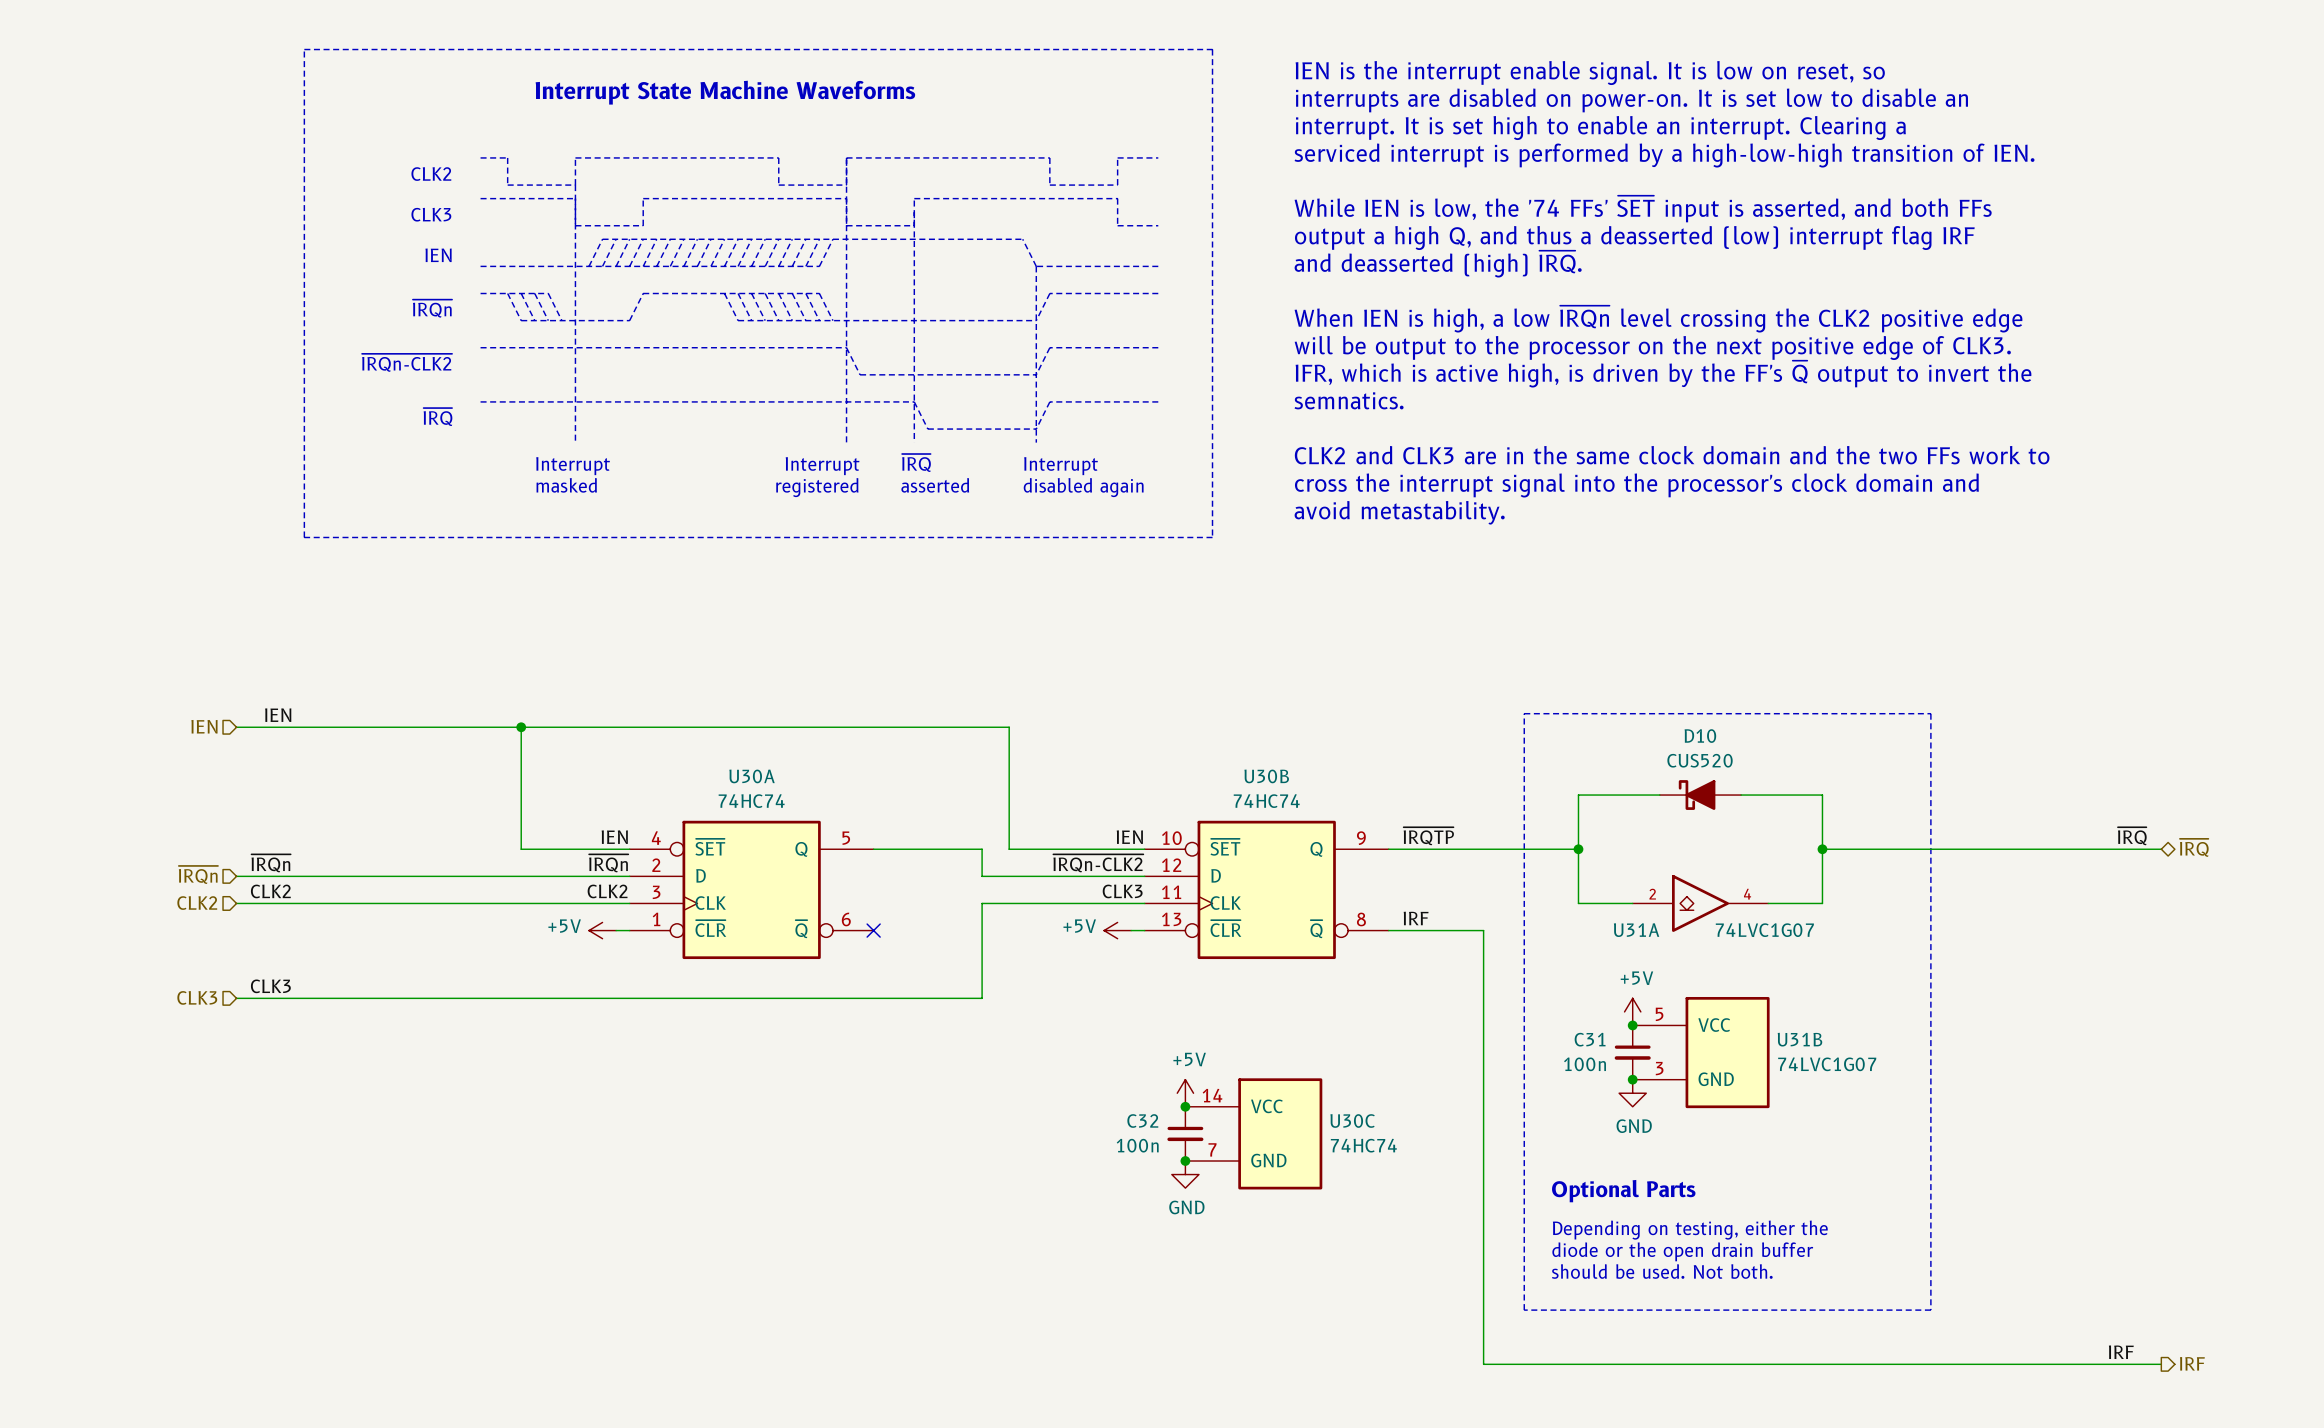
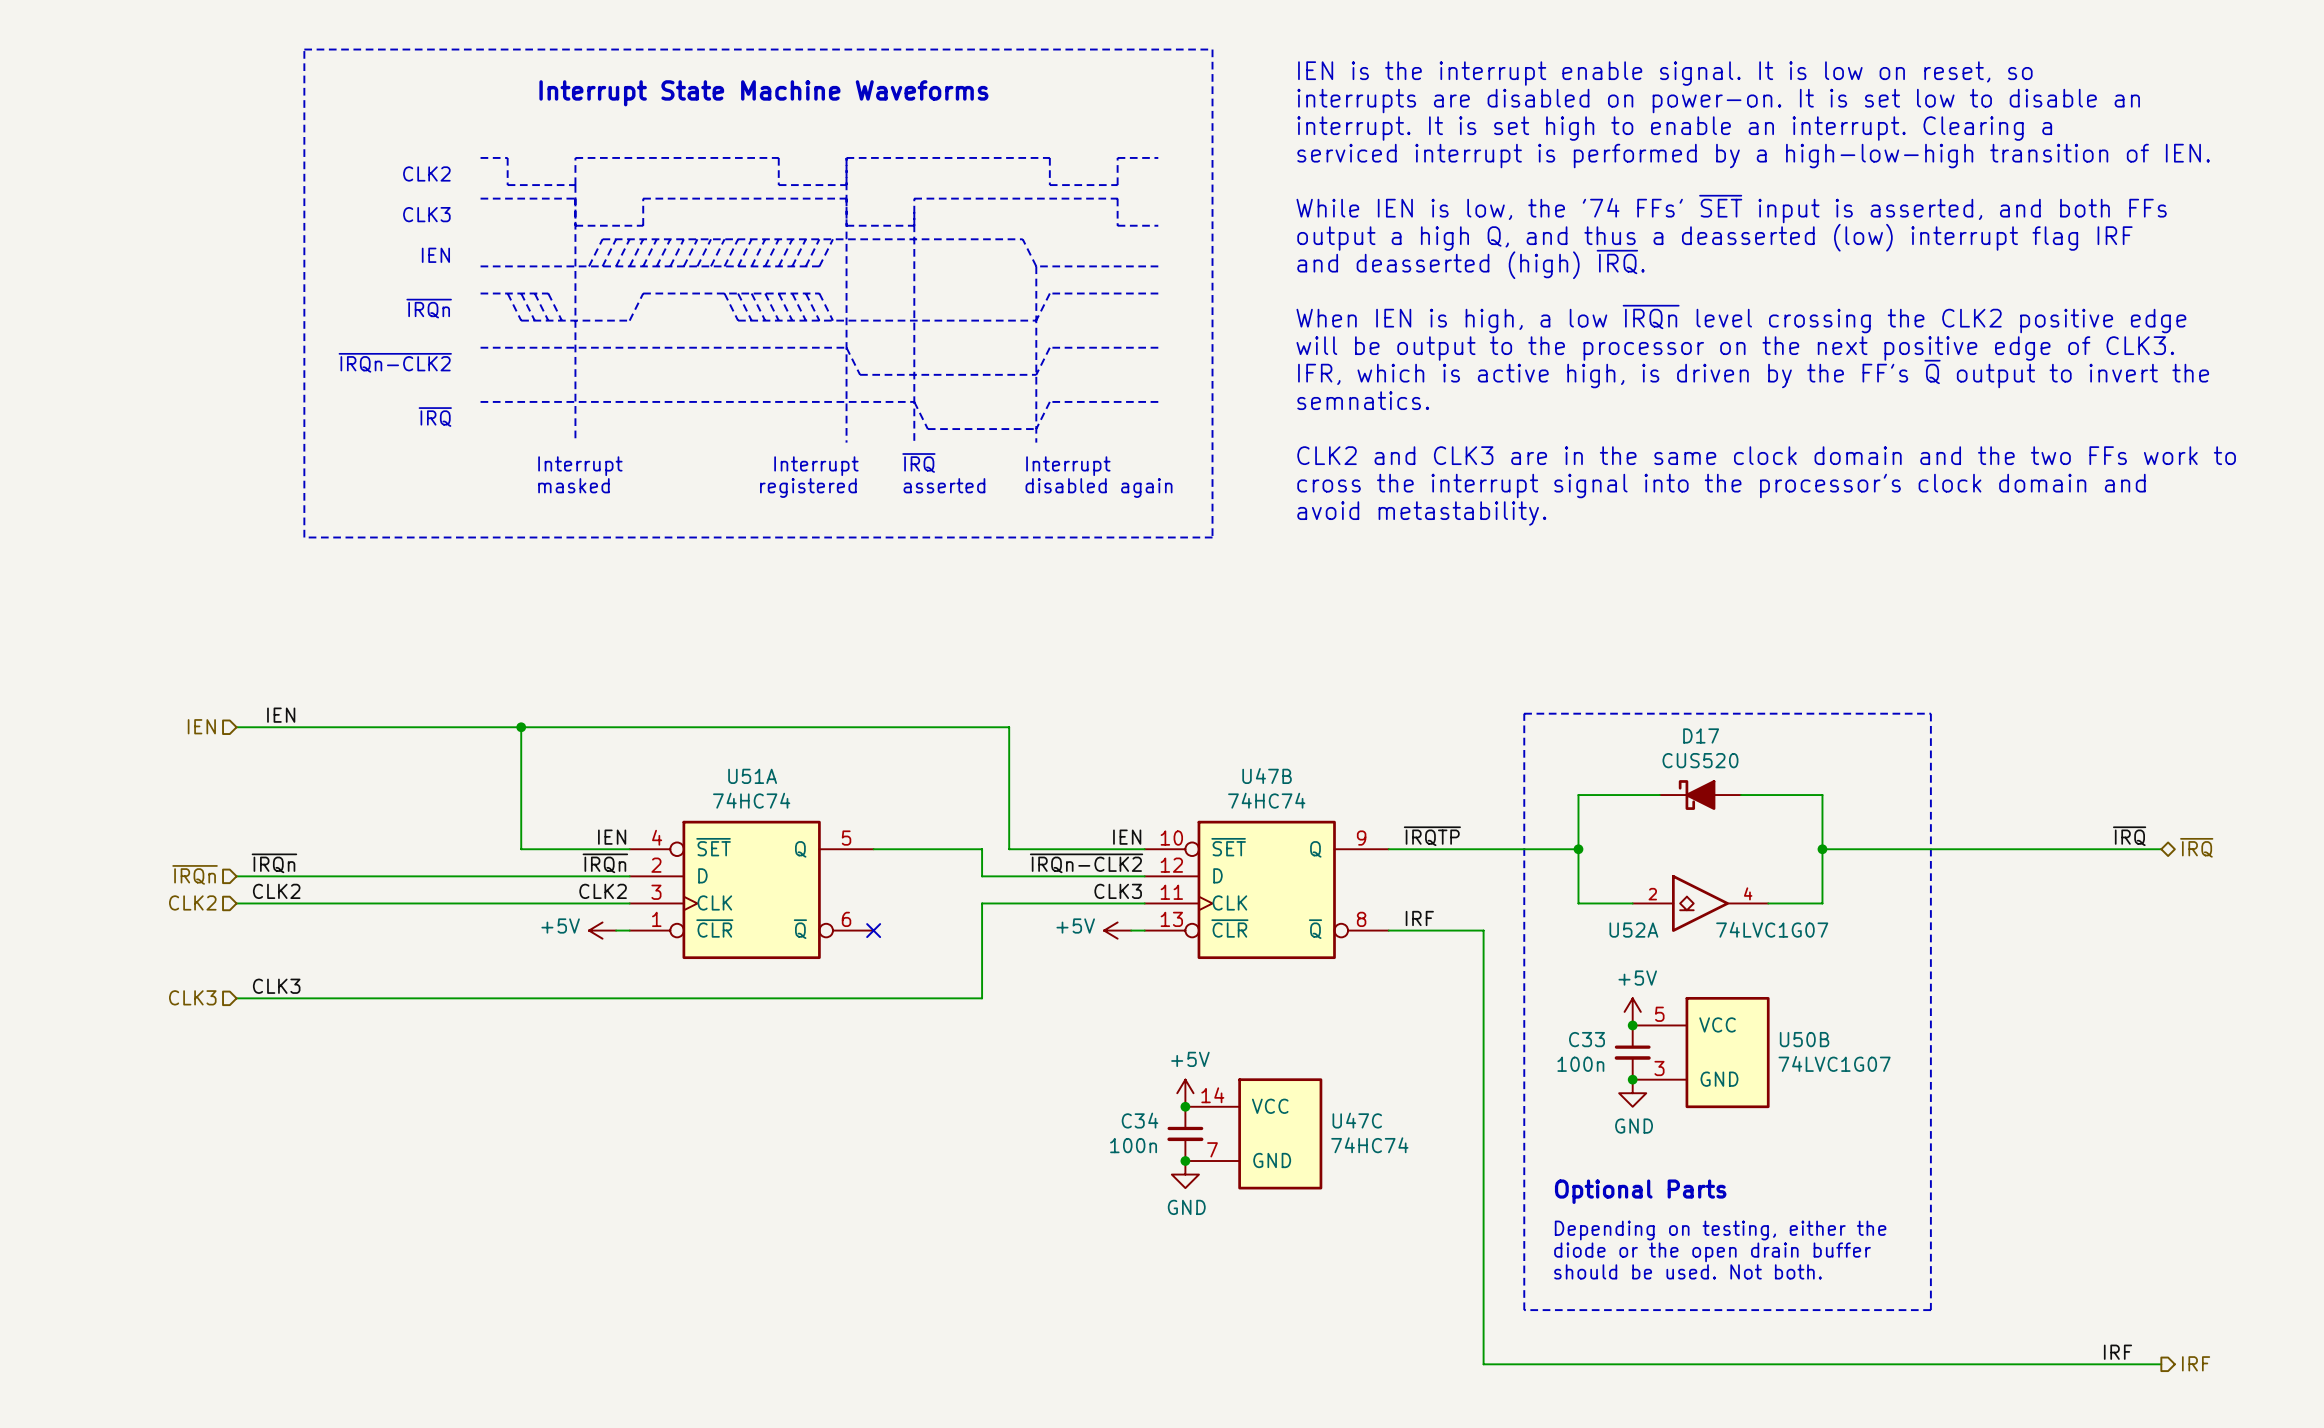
D10 name: D10 (1700, 736) -> D17 (1701, 735)
U30A name: U30A (752, 776) -> U51A (752, 776)
U30B name: U30B (1266, 776) -> U47B (1267, 776)
U31A name: U31A (1636, 930) -> U52A (1633, 930)
C31 name: C31 (1590, 1039) -> C33 (1587, 1039)
U31B name: U31B (1799, 1039) -> U50B (1804, 1039)
U30C name: U30C (1352, 1120) -> U47C (1357, 1120)
C32 name: C32 (1142, 1121) -> C34 (1140, 1120)

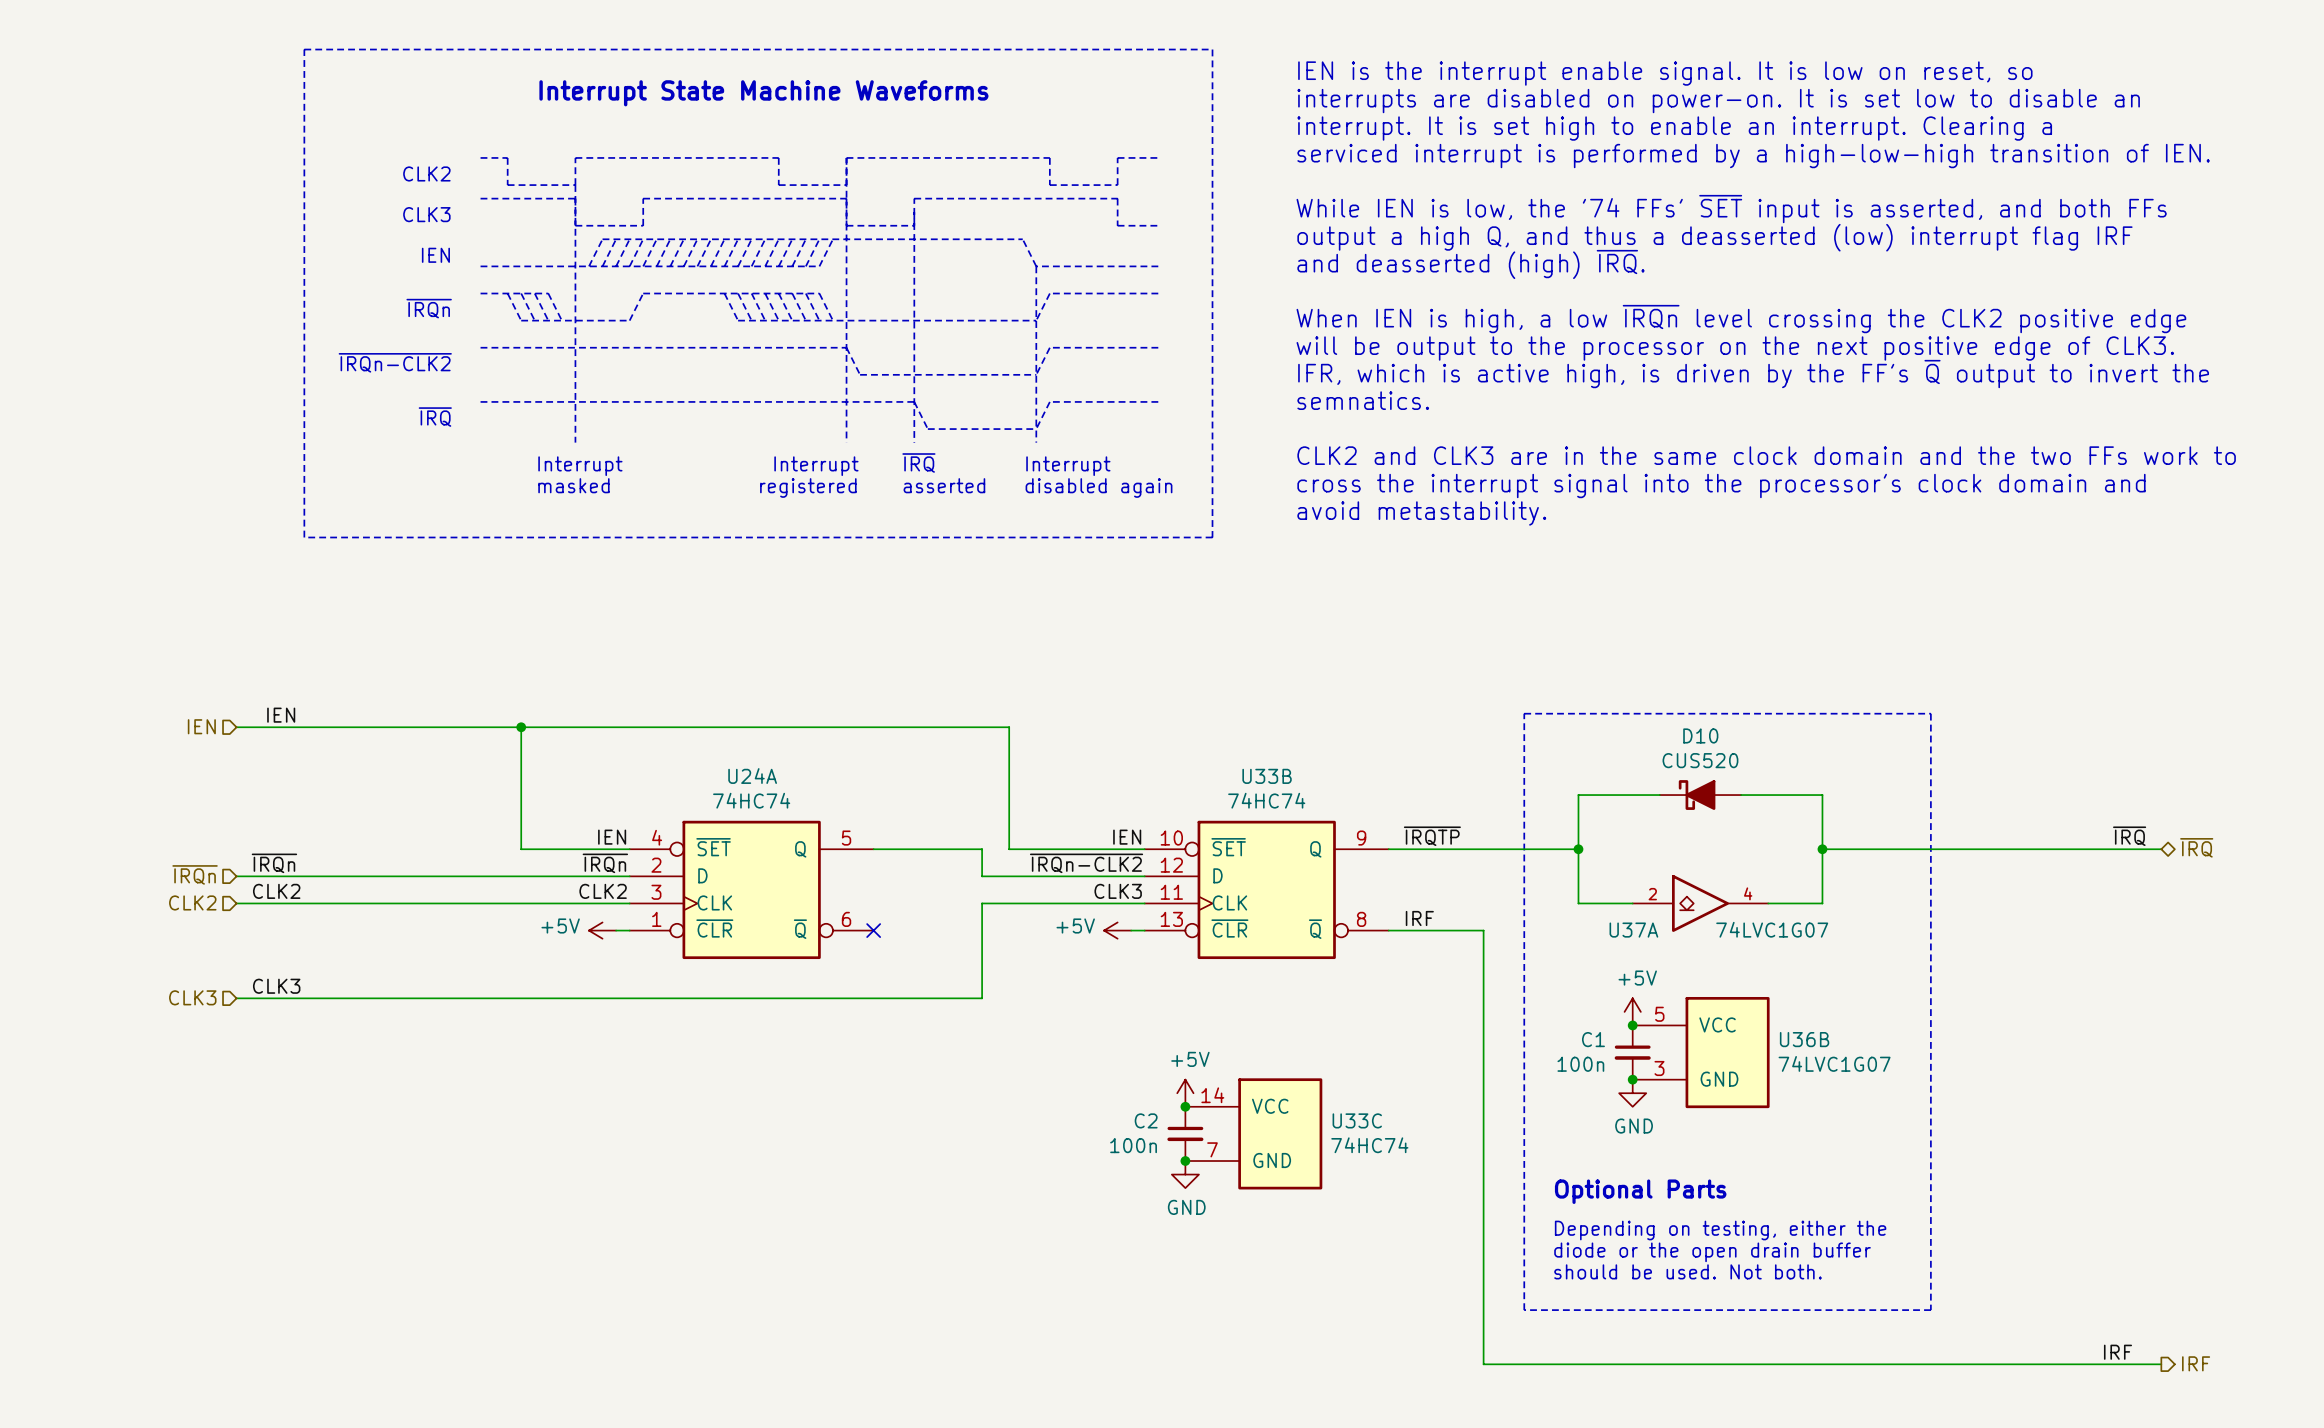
D17 name: D17 (1701, 735) -> D10 (1700, 735)
U51A name: U51A (752, 776) -> U24A (752, 776)
U47B name: U47B (1267, 776) -> U33B (1267, 776)
U52A name: U52A (1633, 930) -> U37A (1633, 930)
C33 name: C33 (1587, 1039) -> C1 (1593, 1039)
U50B name: U50B (1804, 1039) -> U36B (1804, 1039)
C34 name: C34 (1140, 1120) -> C2 (1146, 1120)
U47C name: U47C (1357, 1120) -> U33C (1357, 1120)

